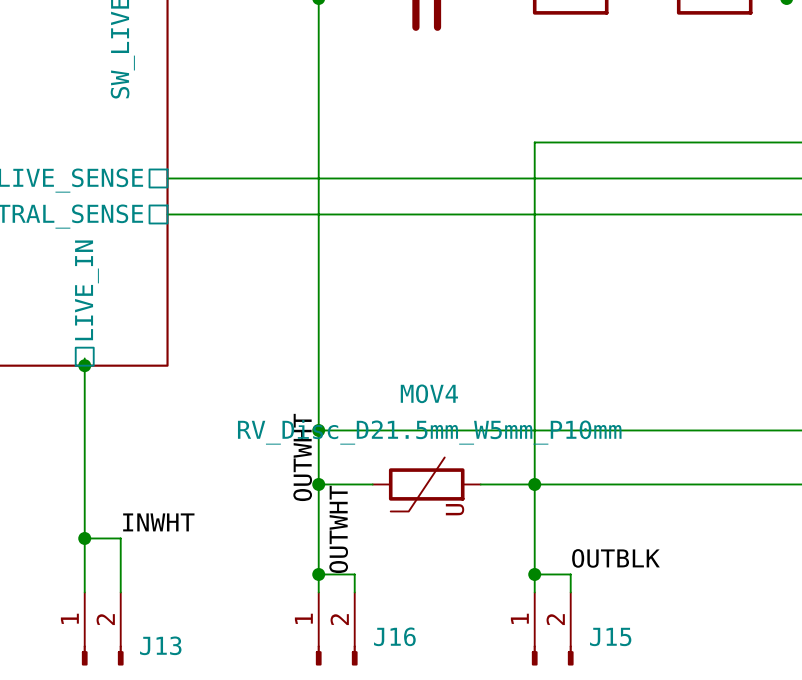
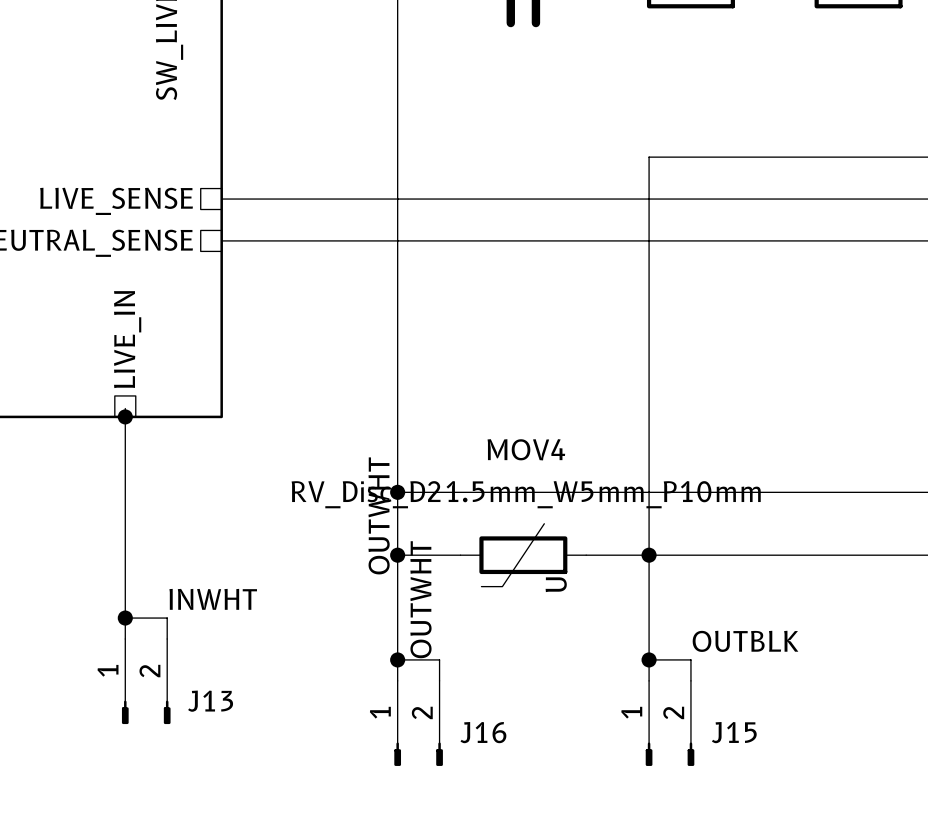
J13 position: (102, 629) -> (146, 681)

